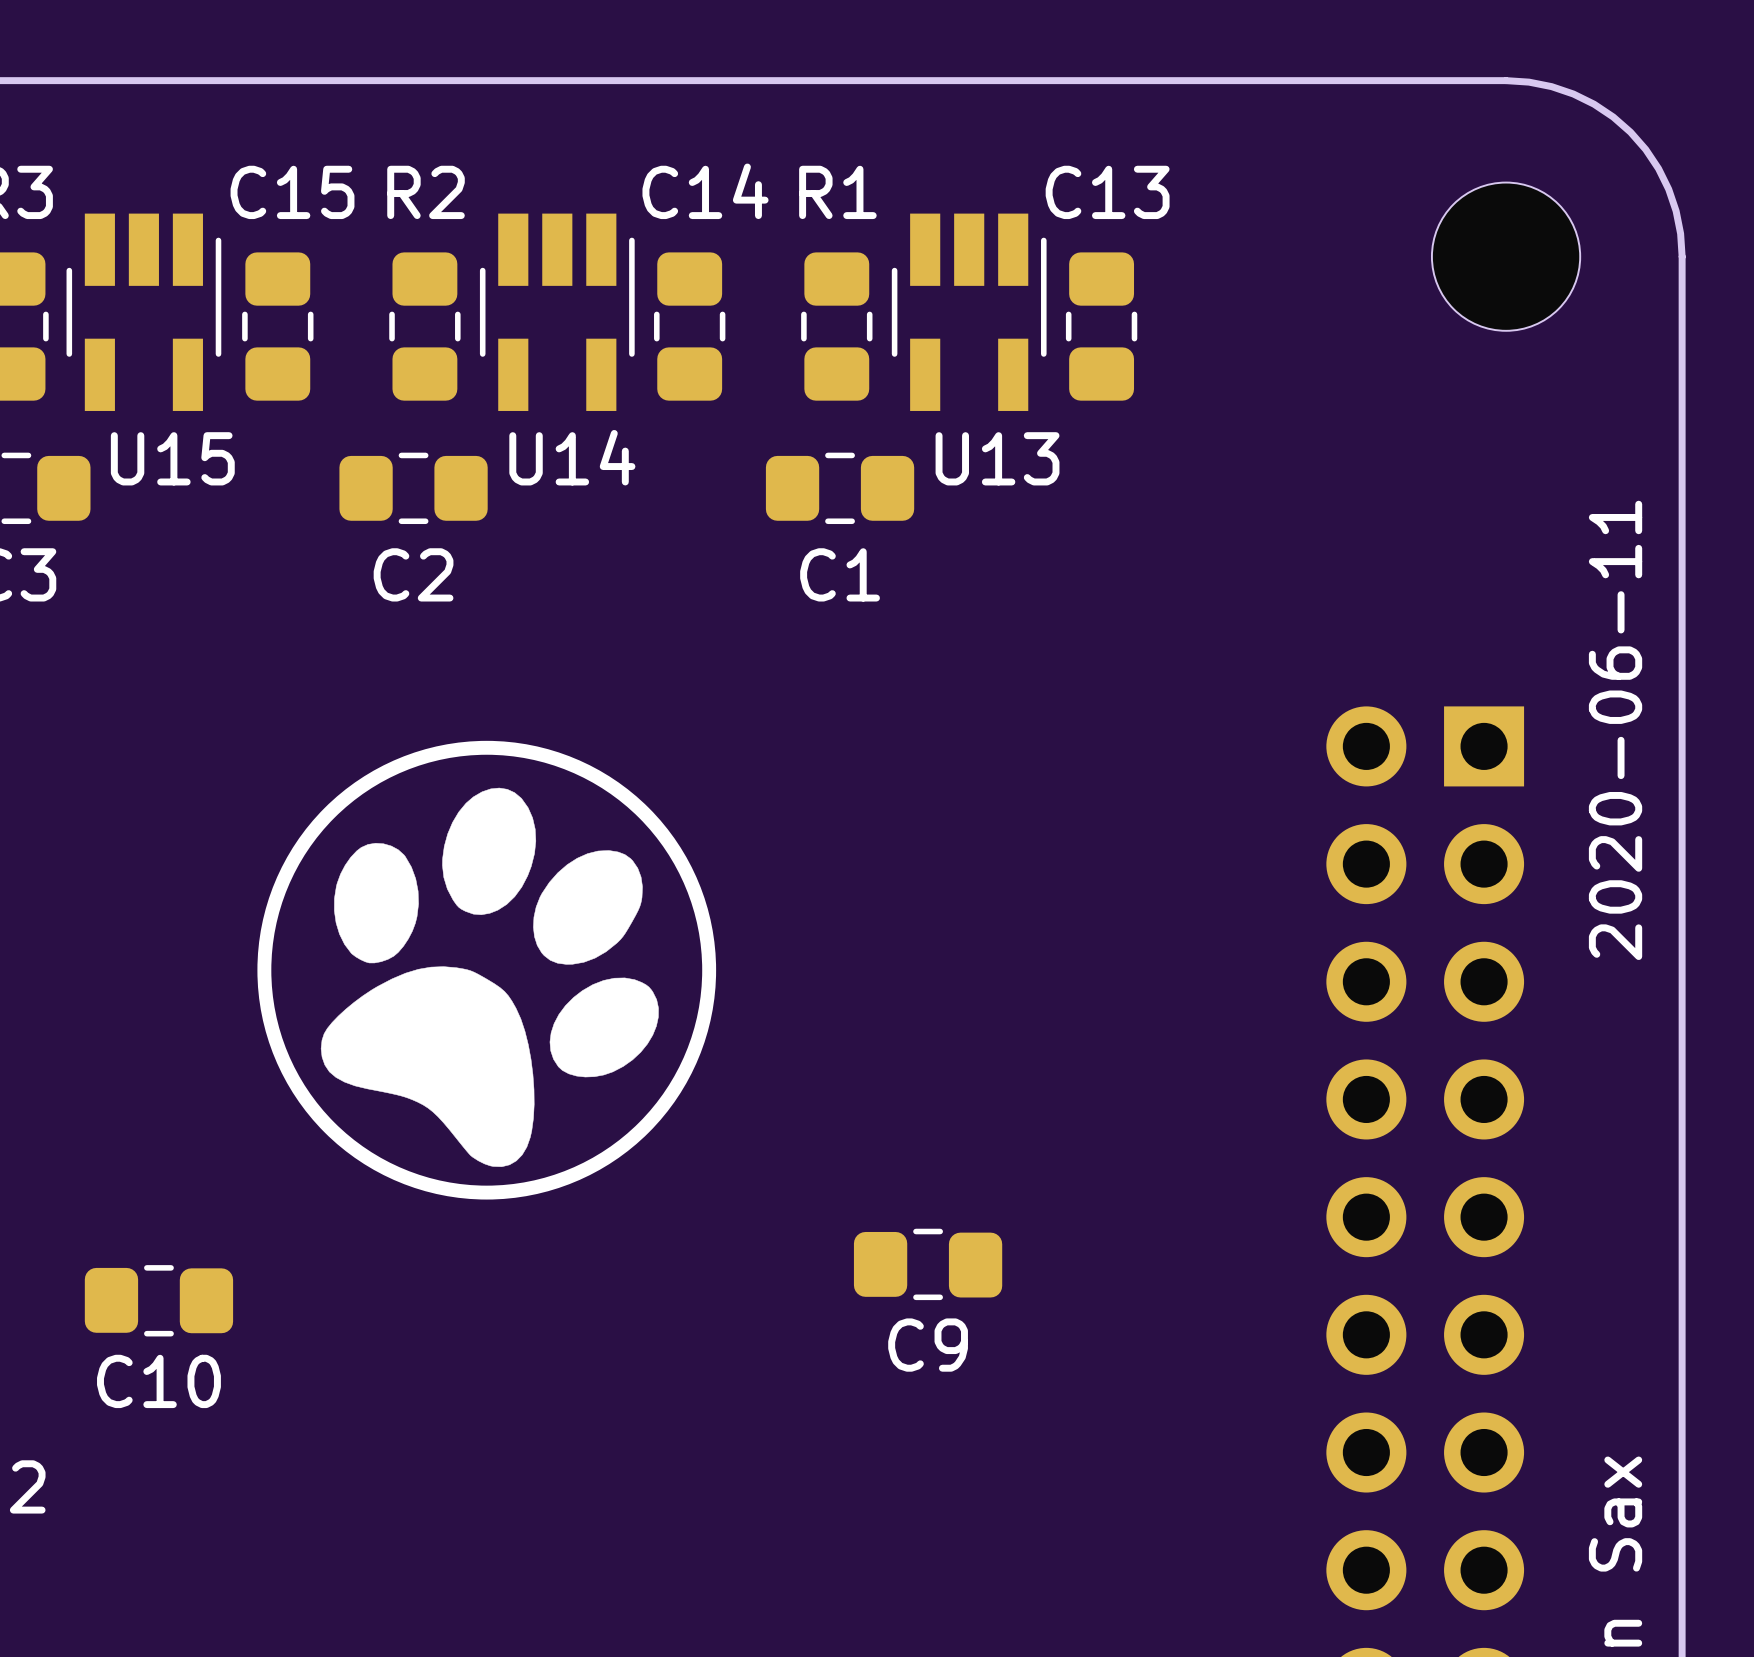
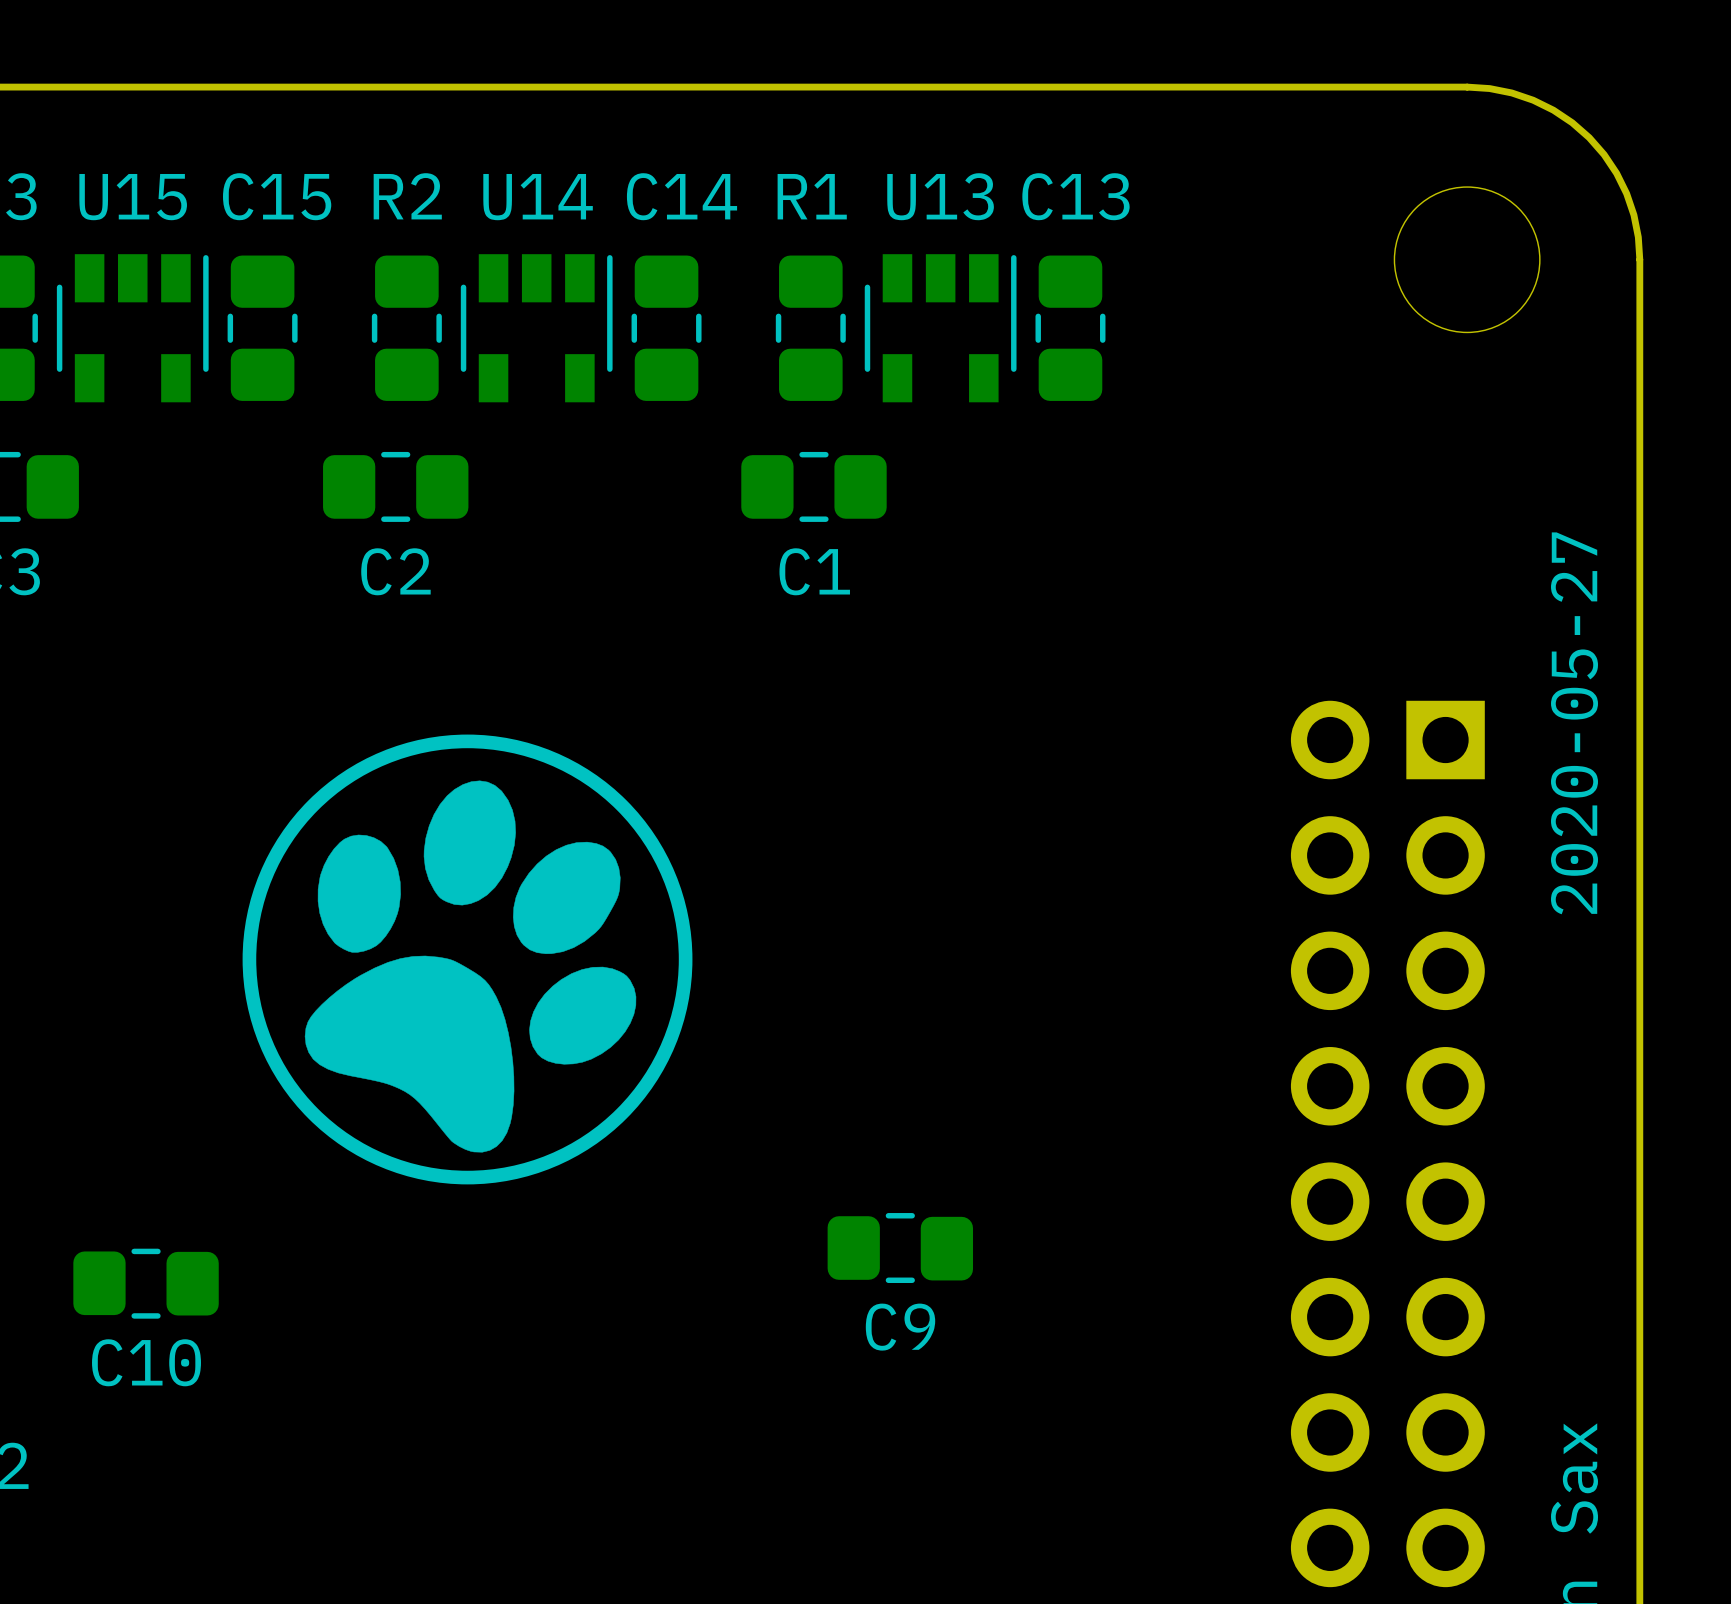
U15 footprint: [66, 213, 222, 411] -> [56, 254, 209, 403]
U14 footprint: [479, 213, 635, 411] -> [460, 254, 613, 403]
U13 footprint: [891, 213, 1047, 411] -> [864, 254, 1017, 403]
U14 name position: U14 (572, 457) -> U14 (538, 197)
U15 name position: U15 (172, 458) -> U15 (133, 197)
U13 name position: U13 (997, 458) -> U13 (940, 196)
text: 2020-06-11 (1615, 730) -> 2020-05-27 (1574, 723)

